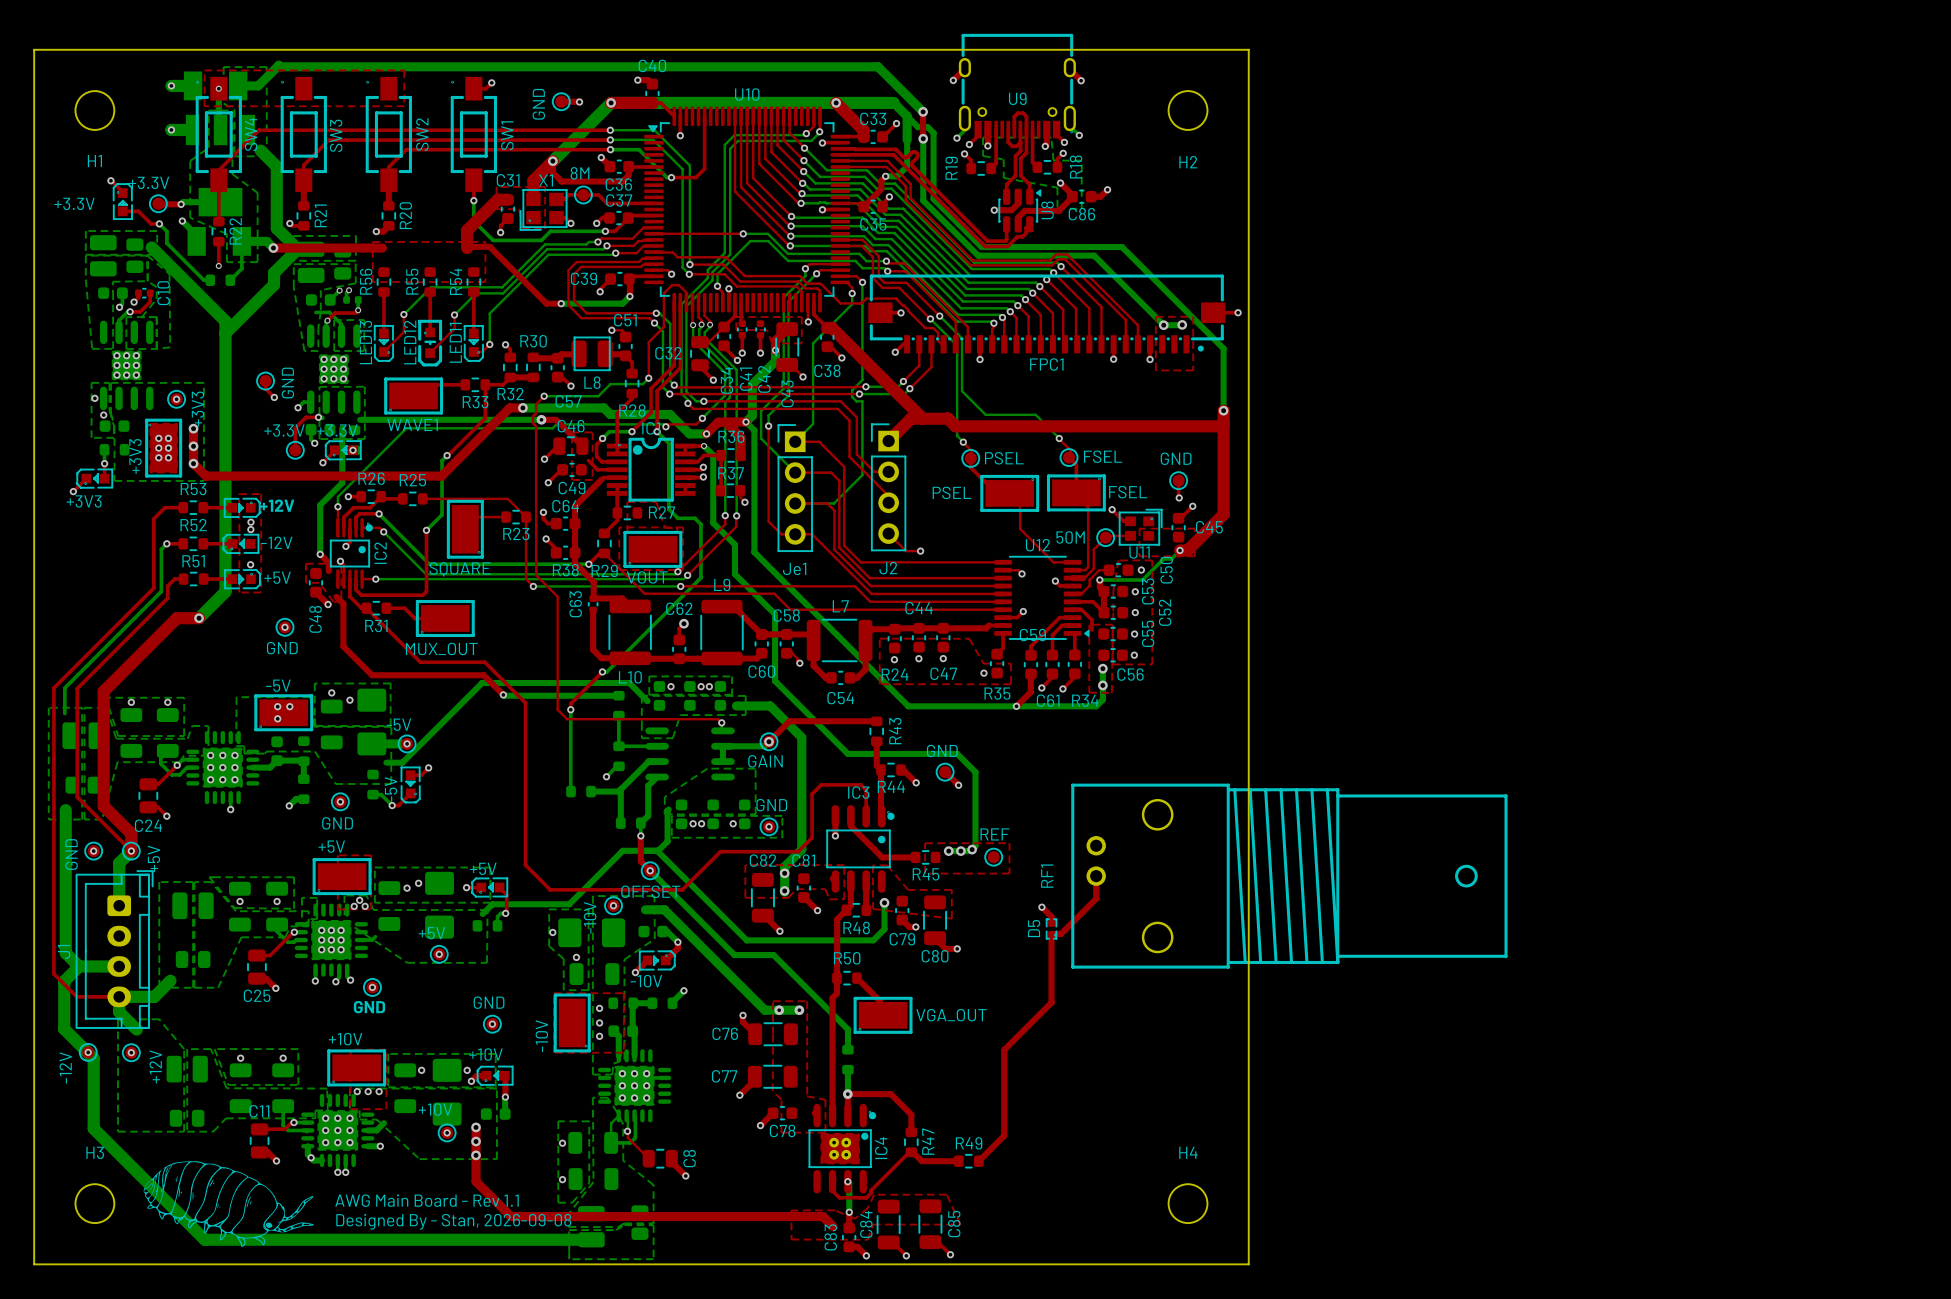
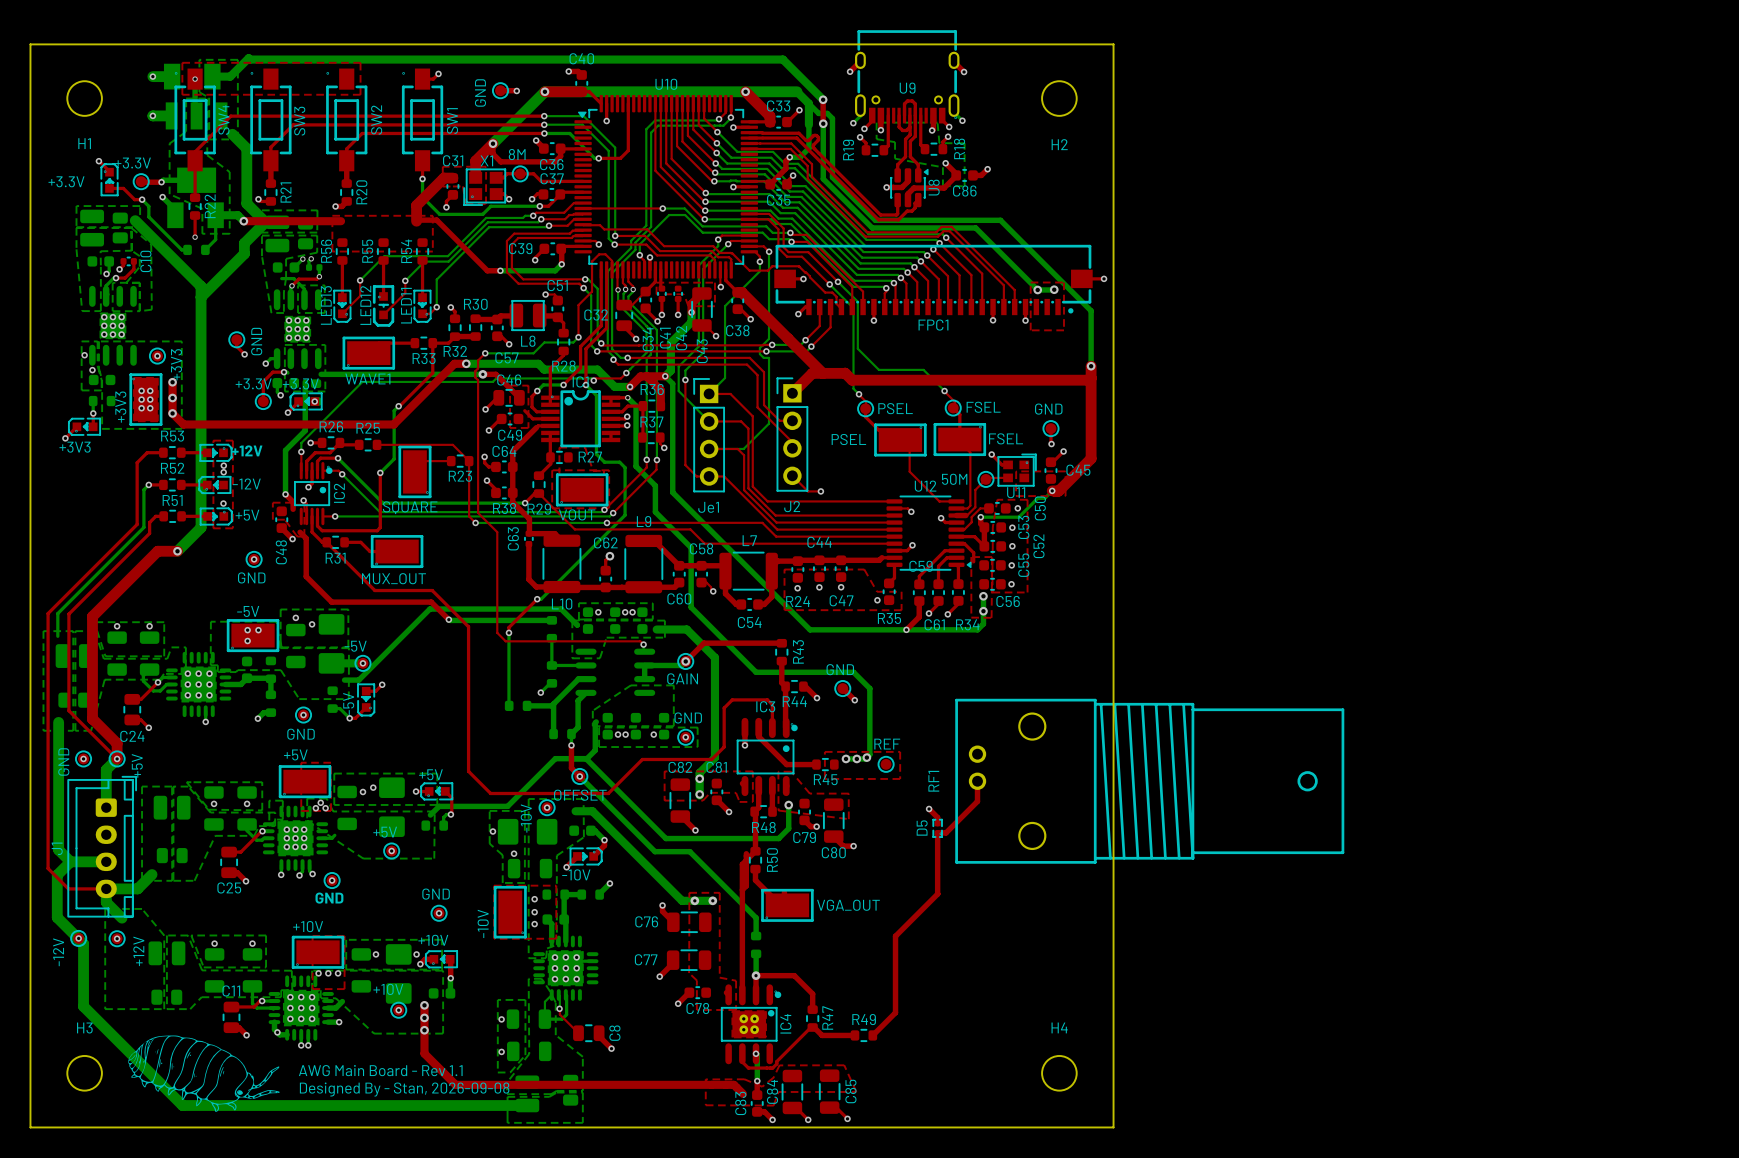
top track: (846, 910) (837, 919) (837, 957) -> (754, 811) (755, 851) (742, 864) (742, 889)
top track: none -> (755, 869) (755, 880) (780, 905) (787, 905)
R50 rotation: 0° (846, 978) -> 90° clockwise (755, 860)
top track: (856, 978) (879, 1000) -> none

